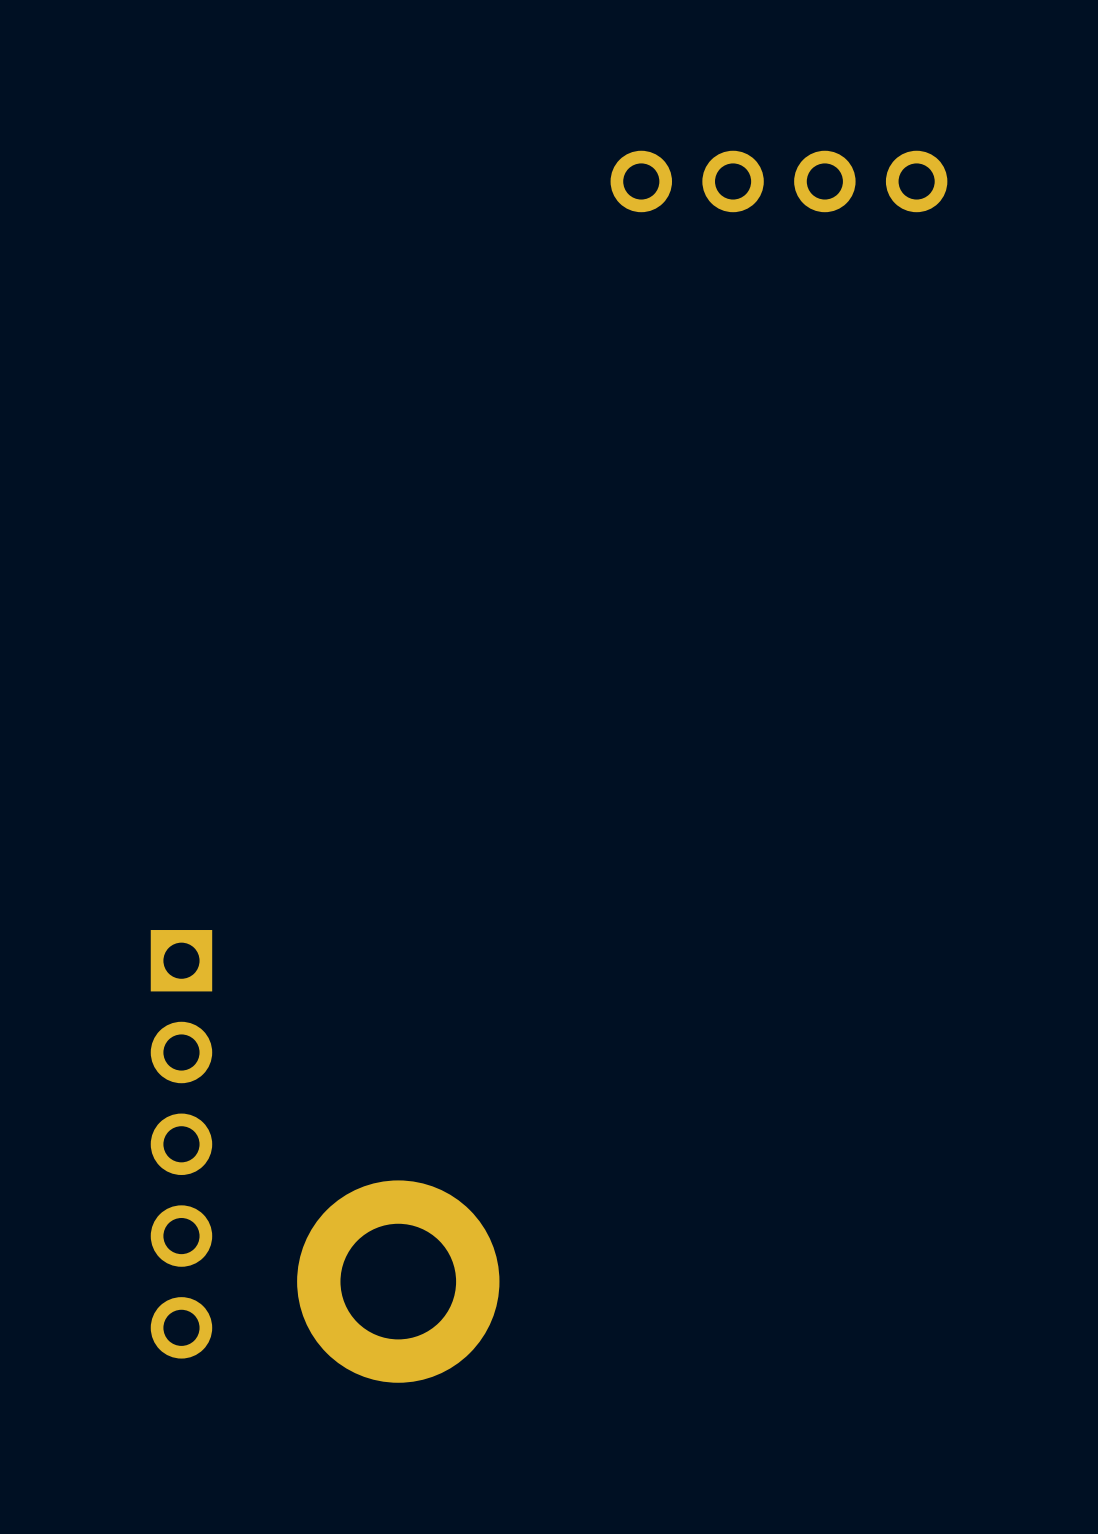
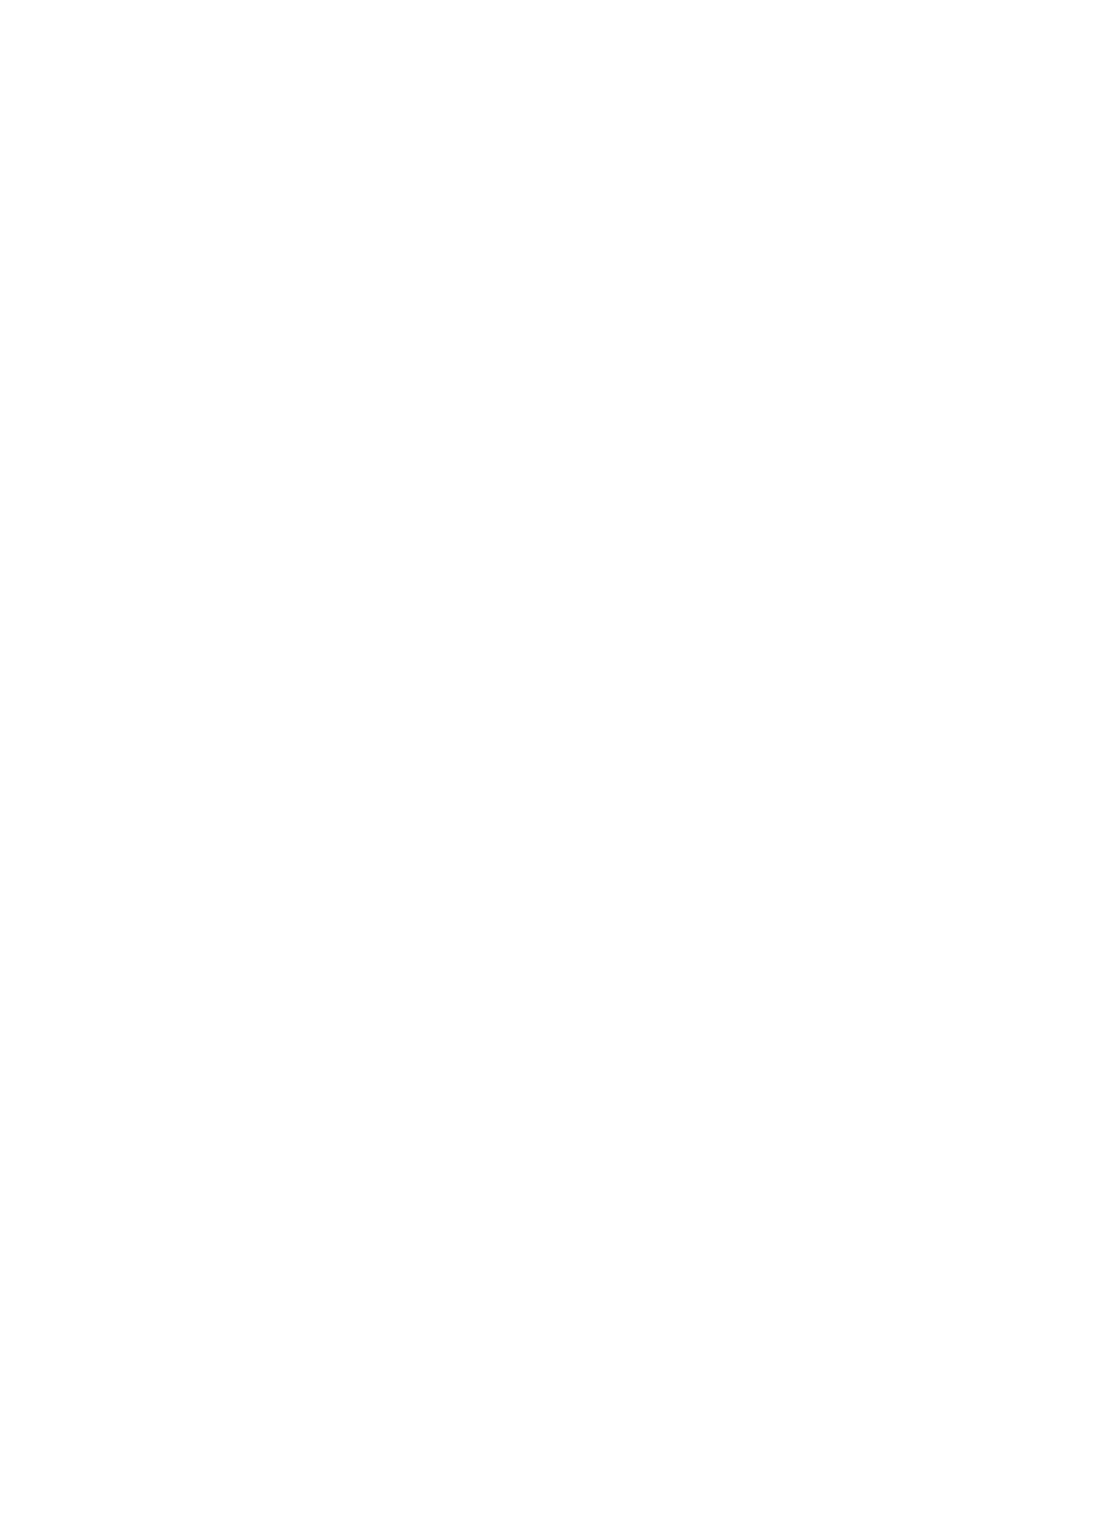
part: (778, 181) -> none
part: (181, 1144) -> none
part: (398, 1281) -> none

